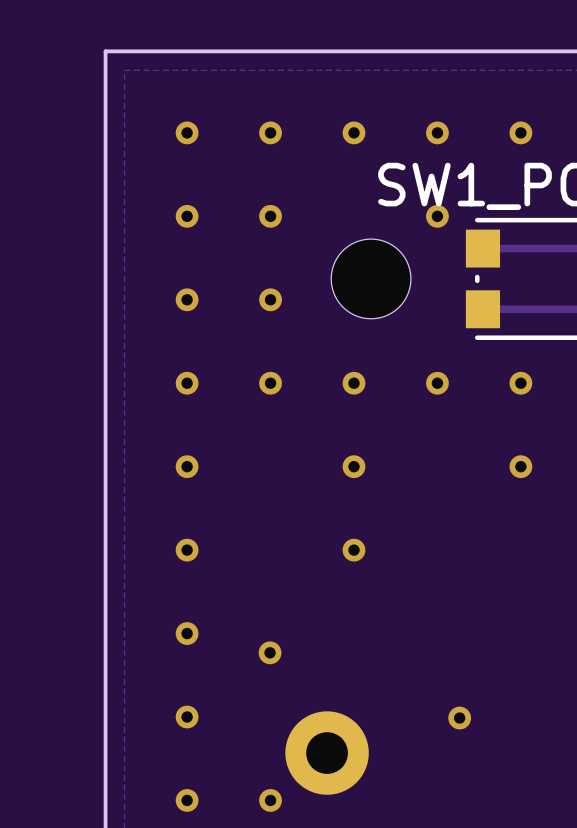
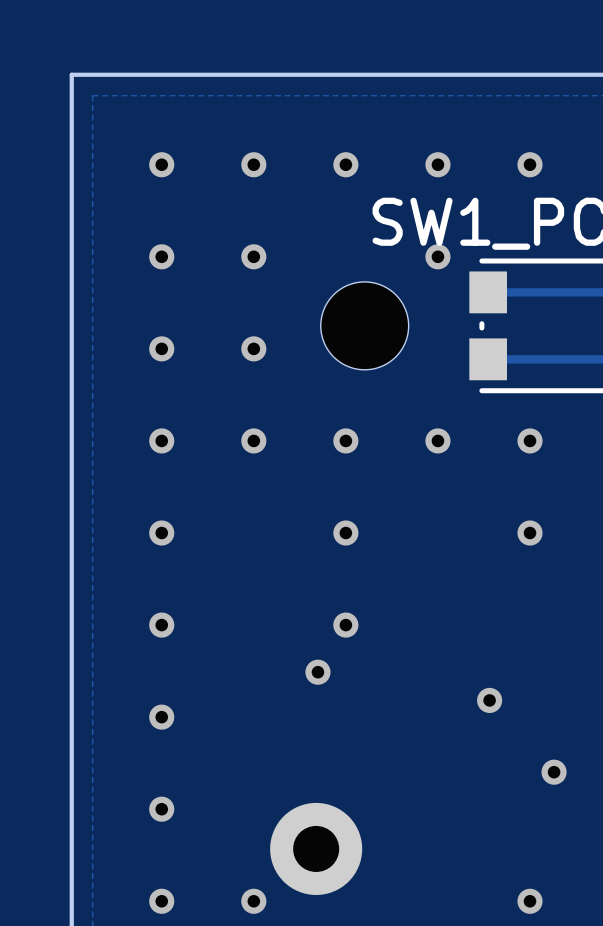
via: none -> (489, 700)
via position: (270, 652) -> (317, 672)
via: none -> (554, 772)
via: (459, 718) -> none
via: none -> (530, 901)

